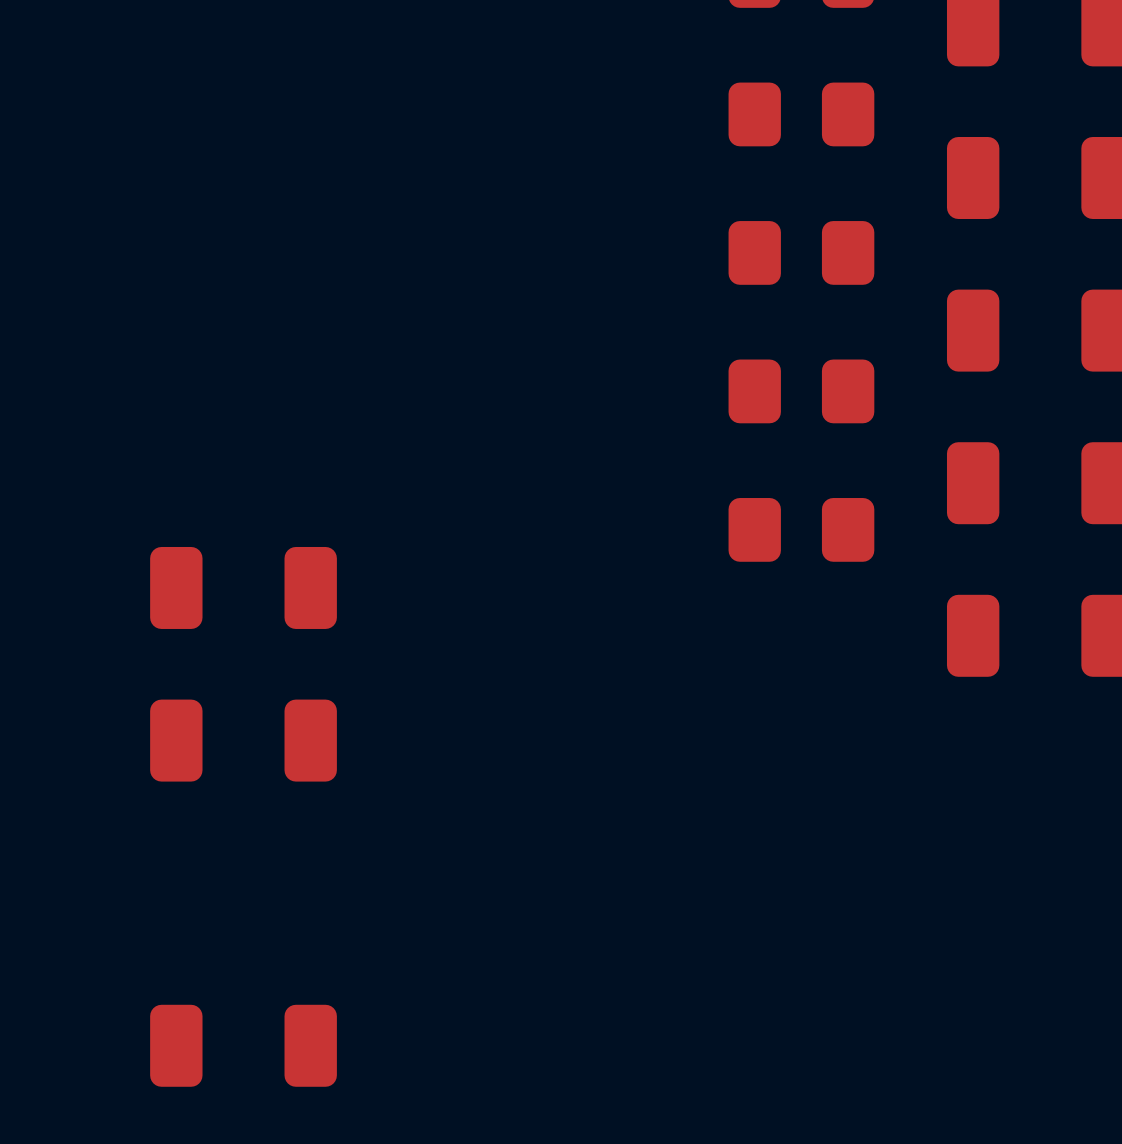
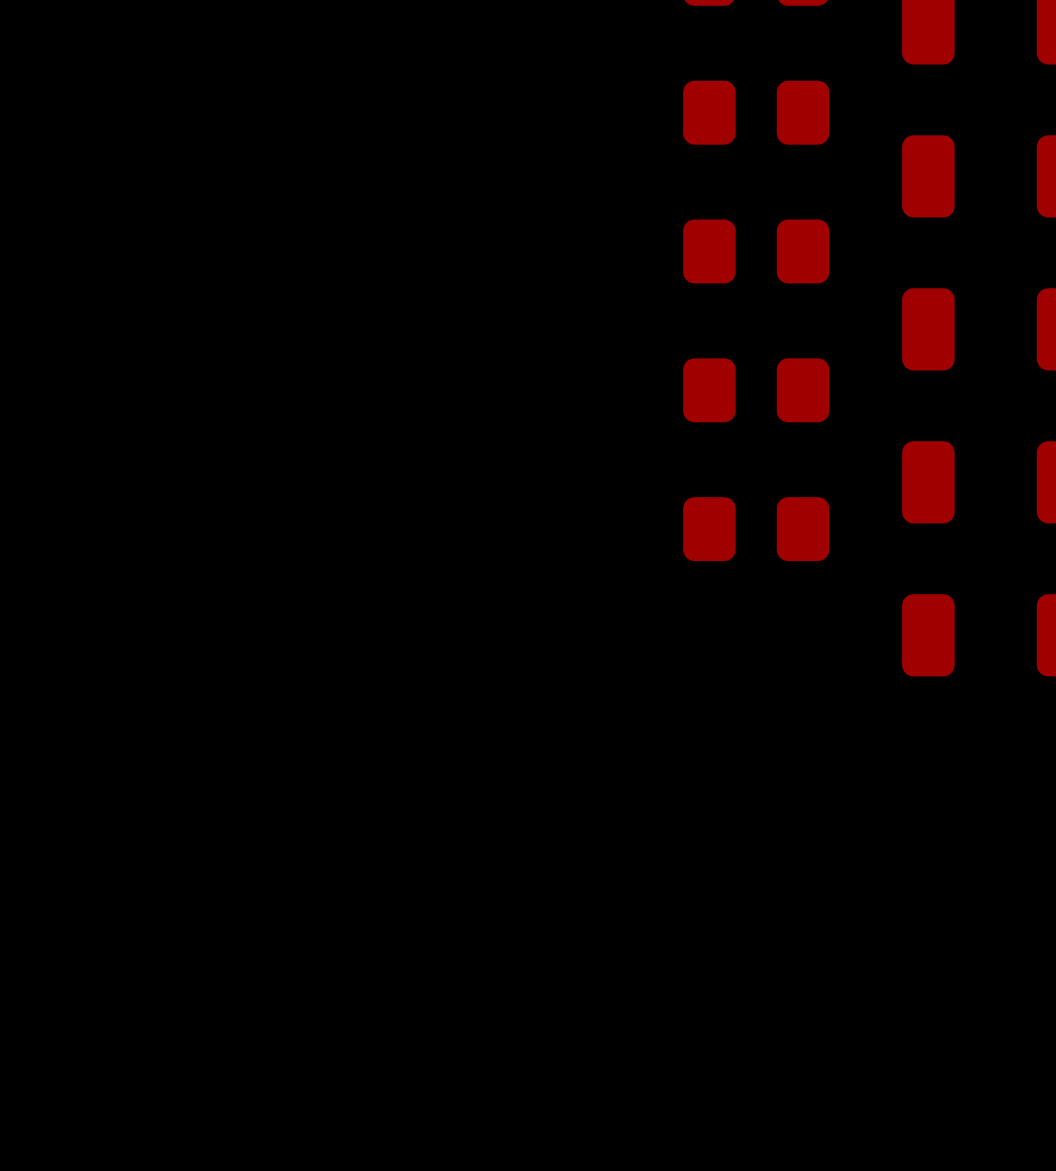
part: (243, 587) -> none
part: (243, 740) -> none
part: (243, 1045) -> none

